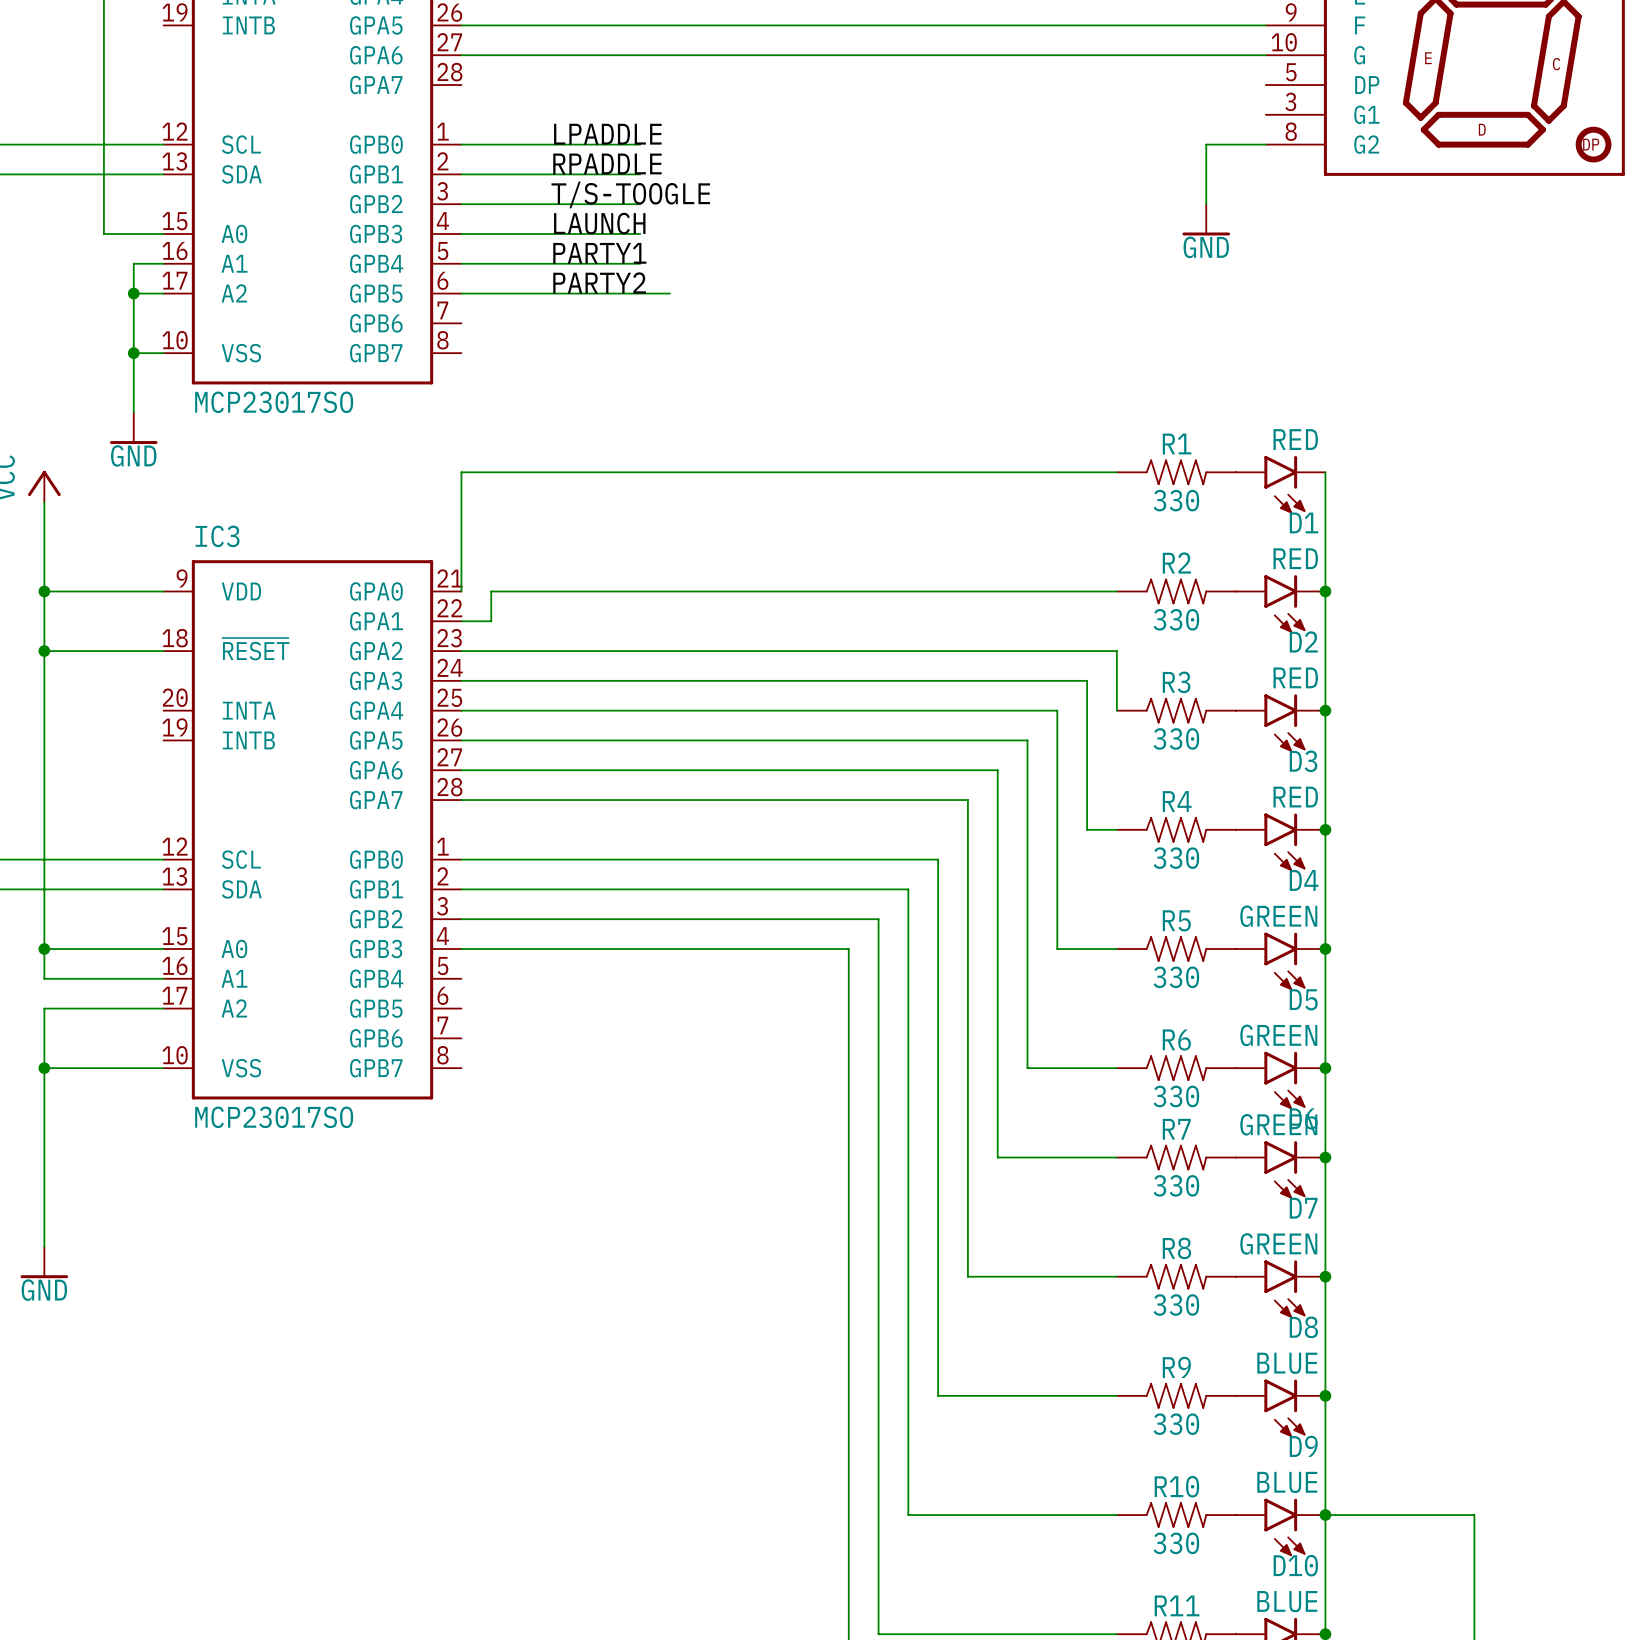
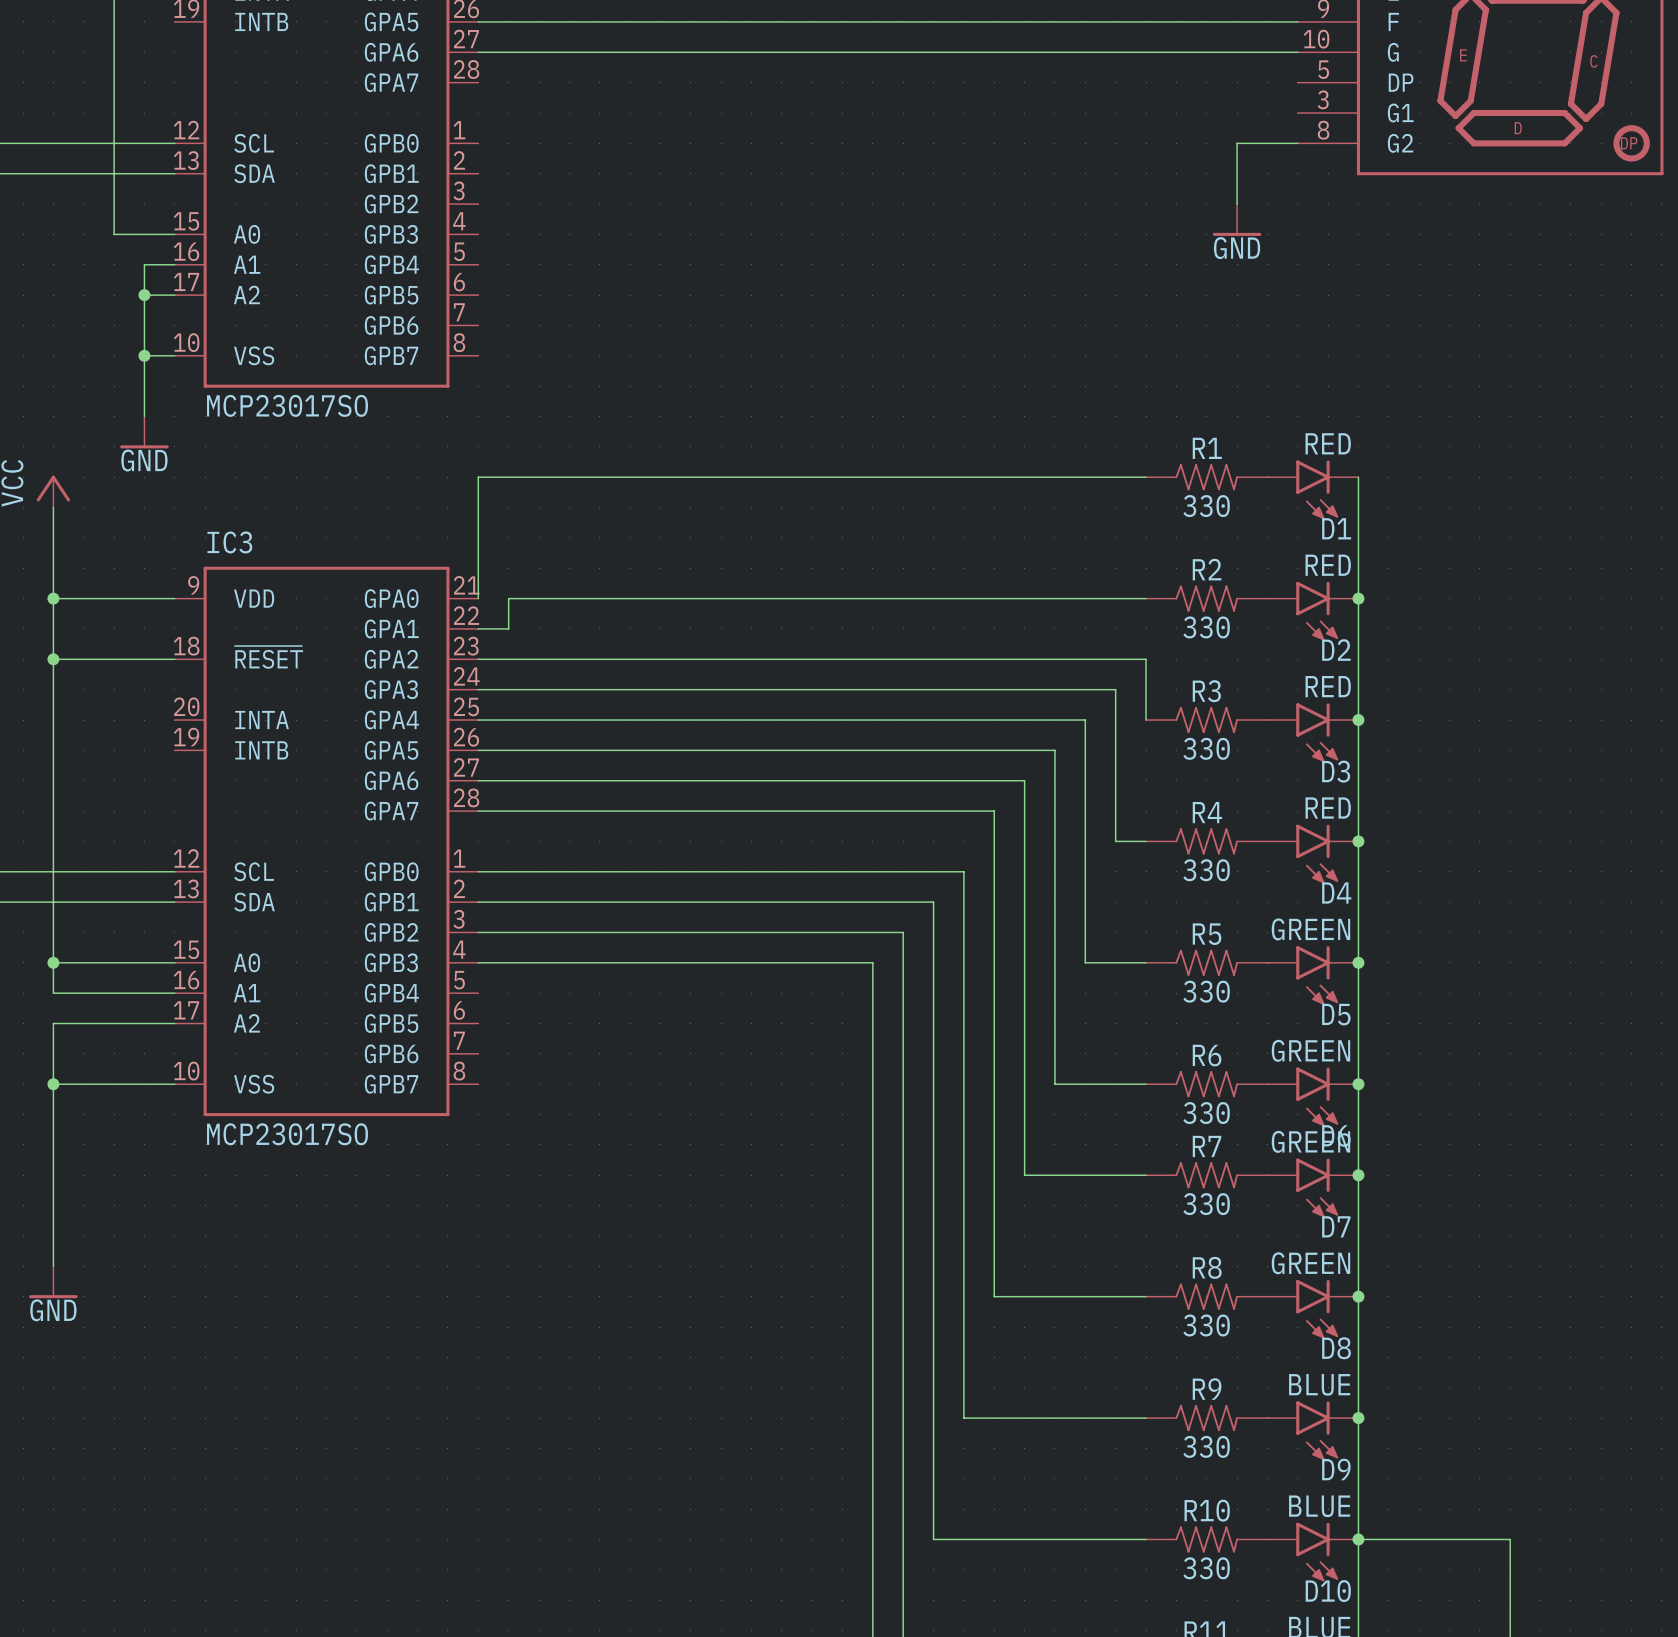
label: LPADDLE (607, 134) -> none
wire: (461, 144) (640, 144) -> none
label: RPADDLE (607, 163) -> none
wire: (461, 174) (640, 174) -> none
label: T/S-TOOGLE (630, 194) -> none
wire: (461, 204) (640, 204) -> none
label: LAUNCH (599, 223) -> none
wire: (461, 233) (640, 233) -> none
label: PARTY1 (599, 253) -> none
wire: (461, 263) (640, 263) -> none
label: PARTY2 (599, 282) -> none
wire: (461, 293) (670, 293) -> none

